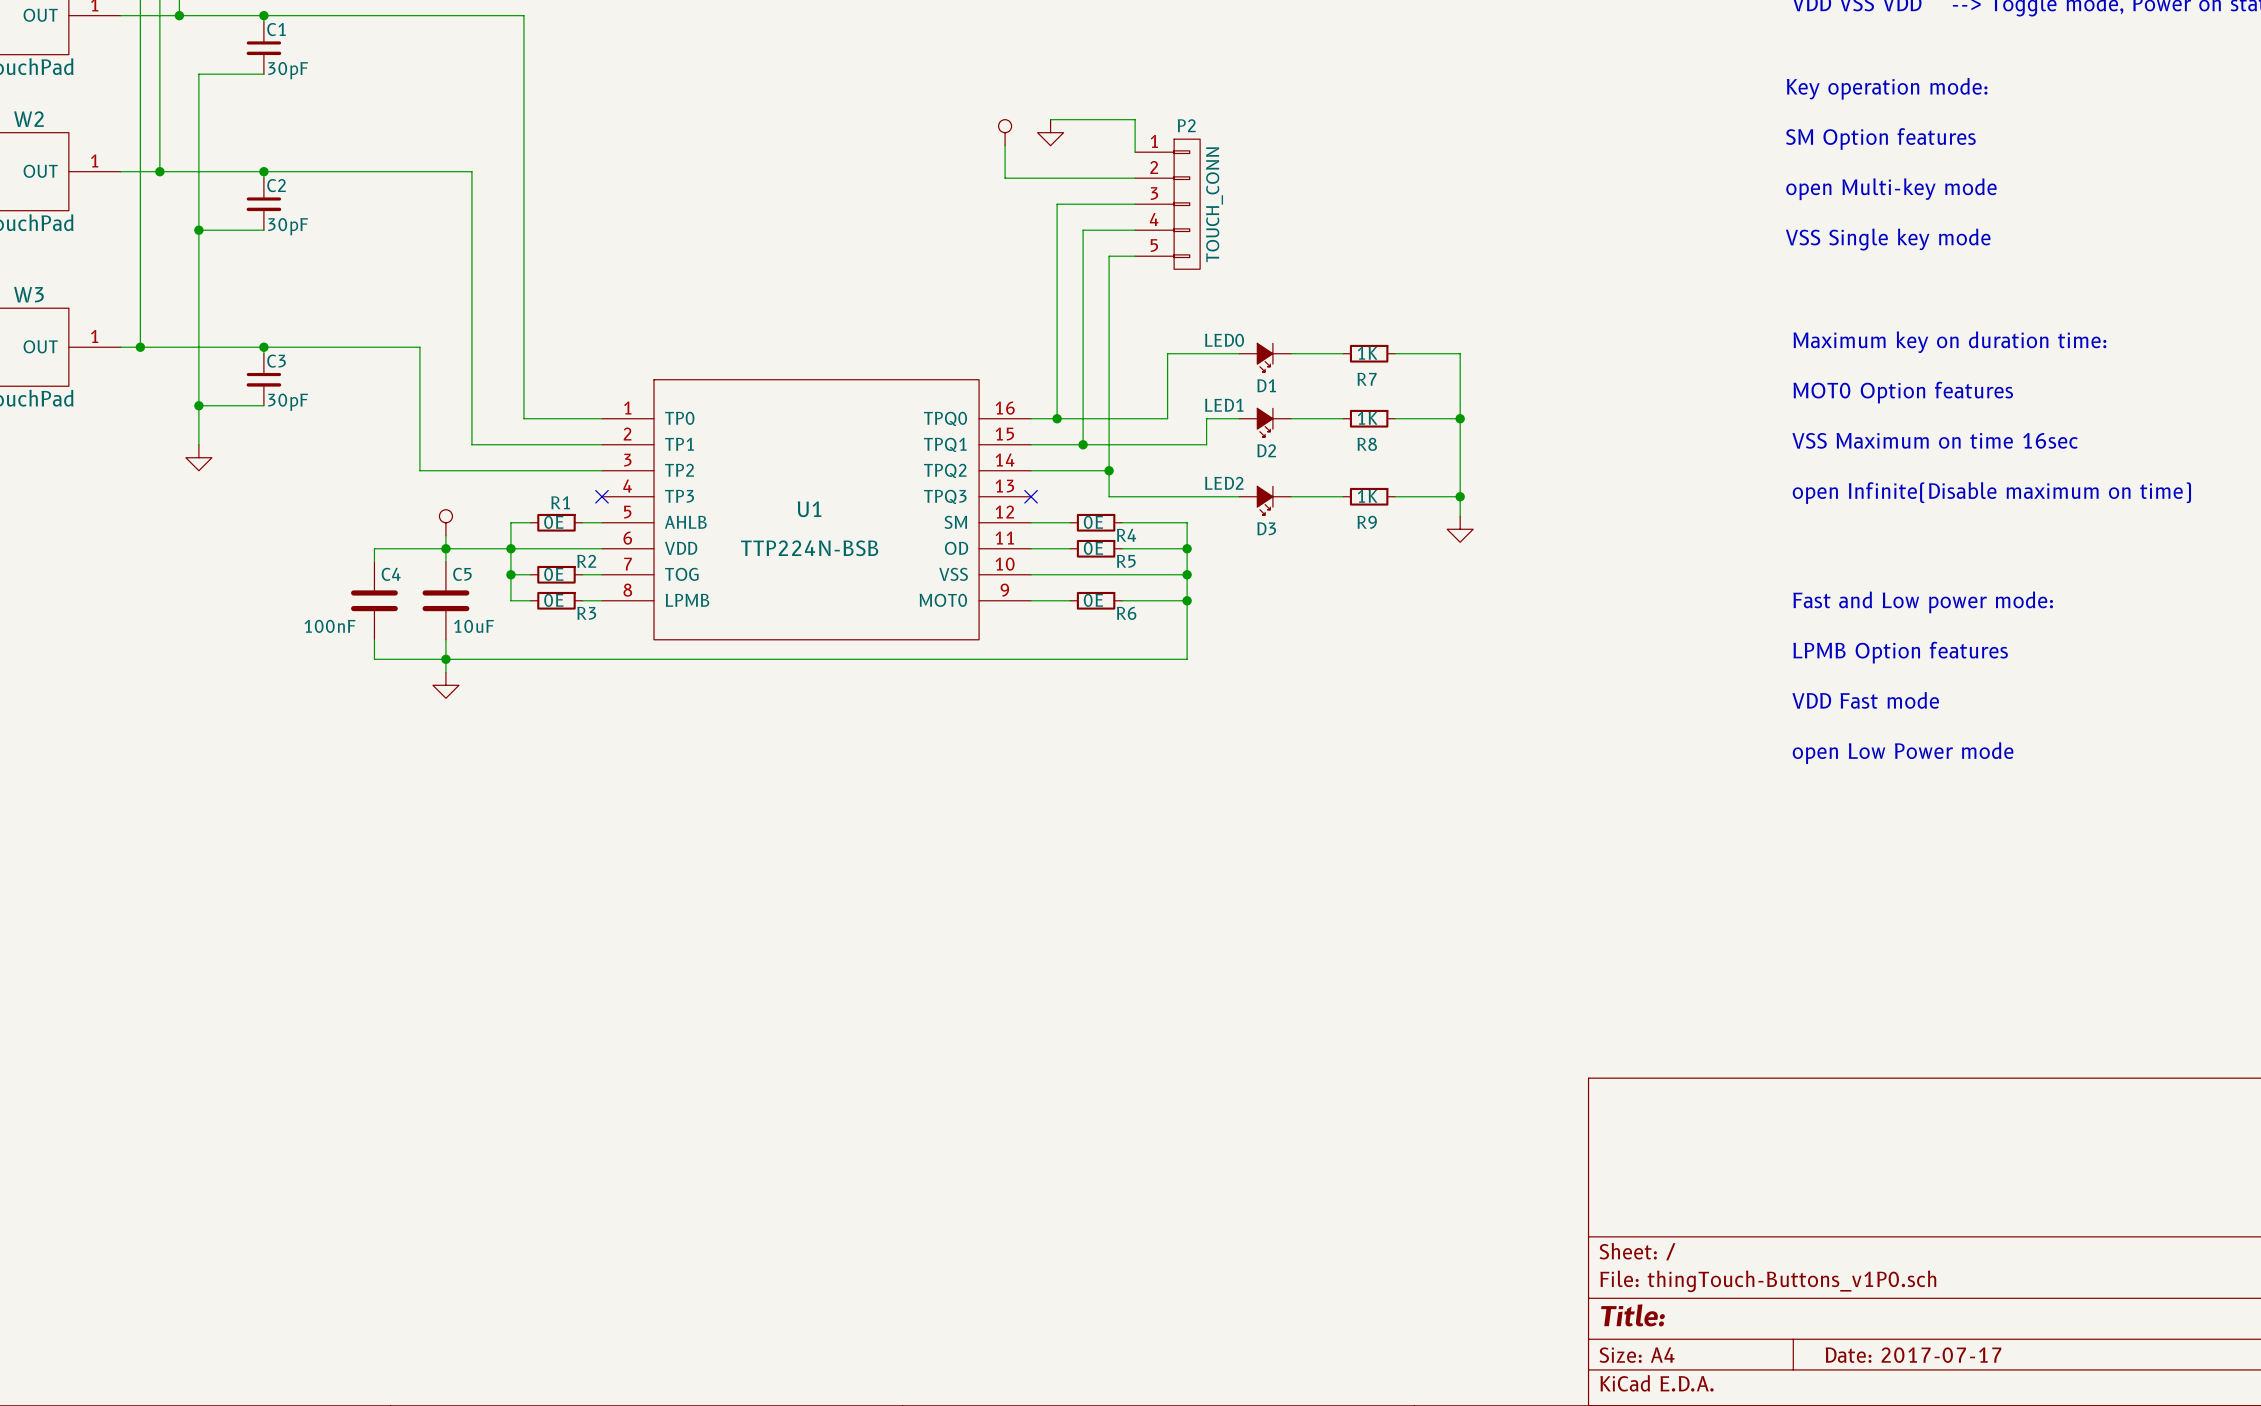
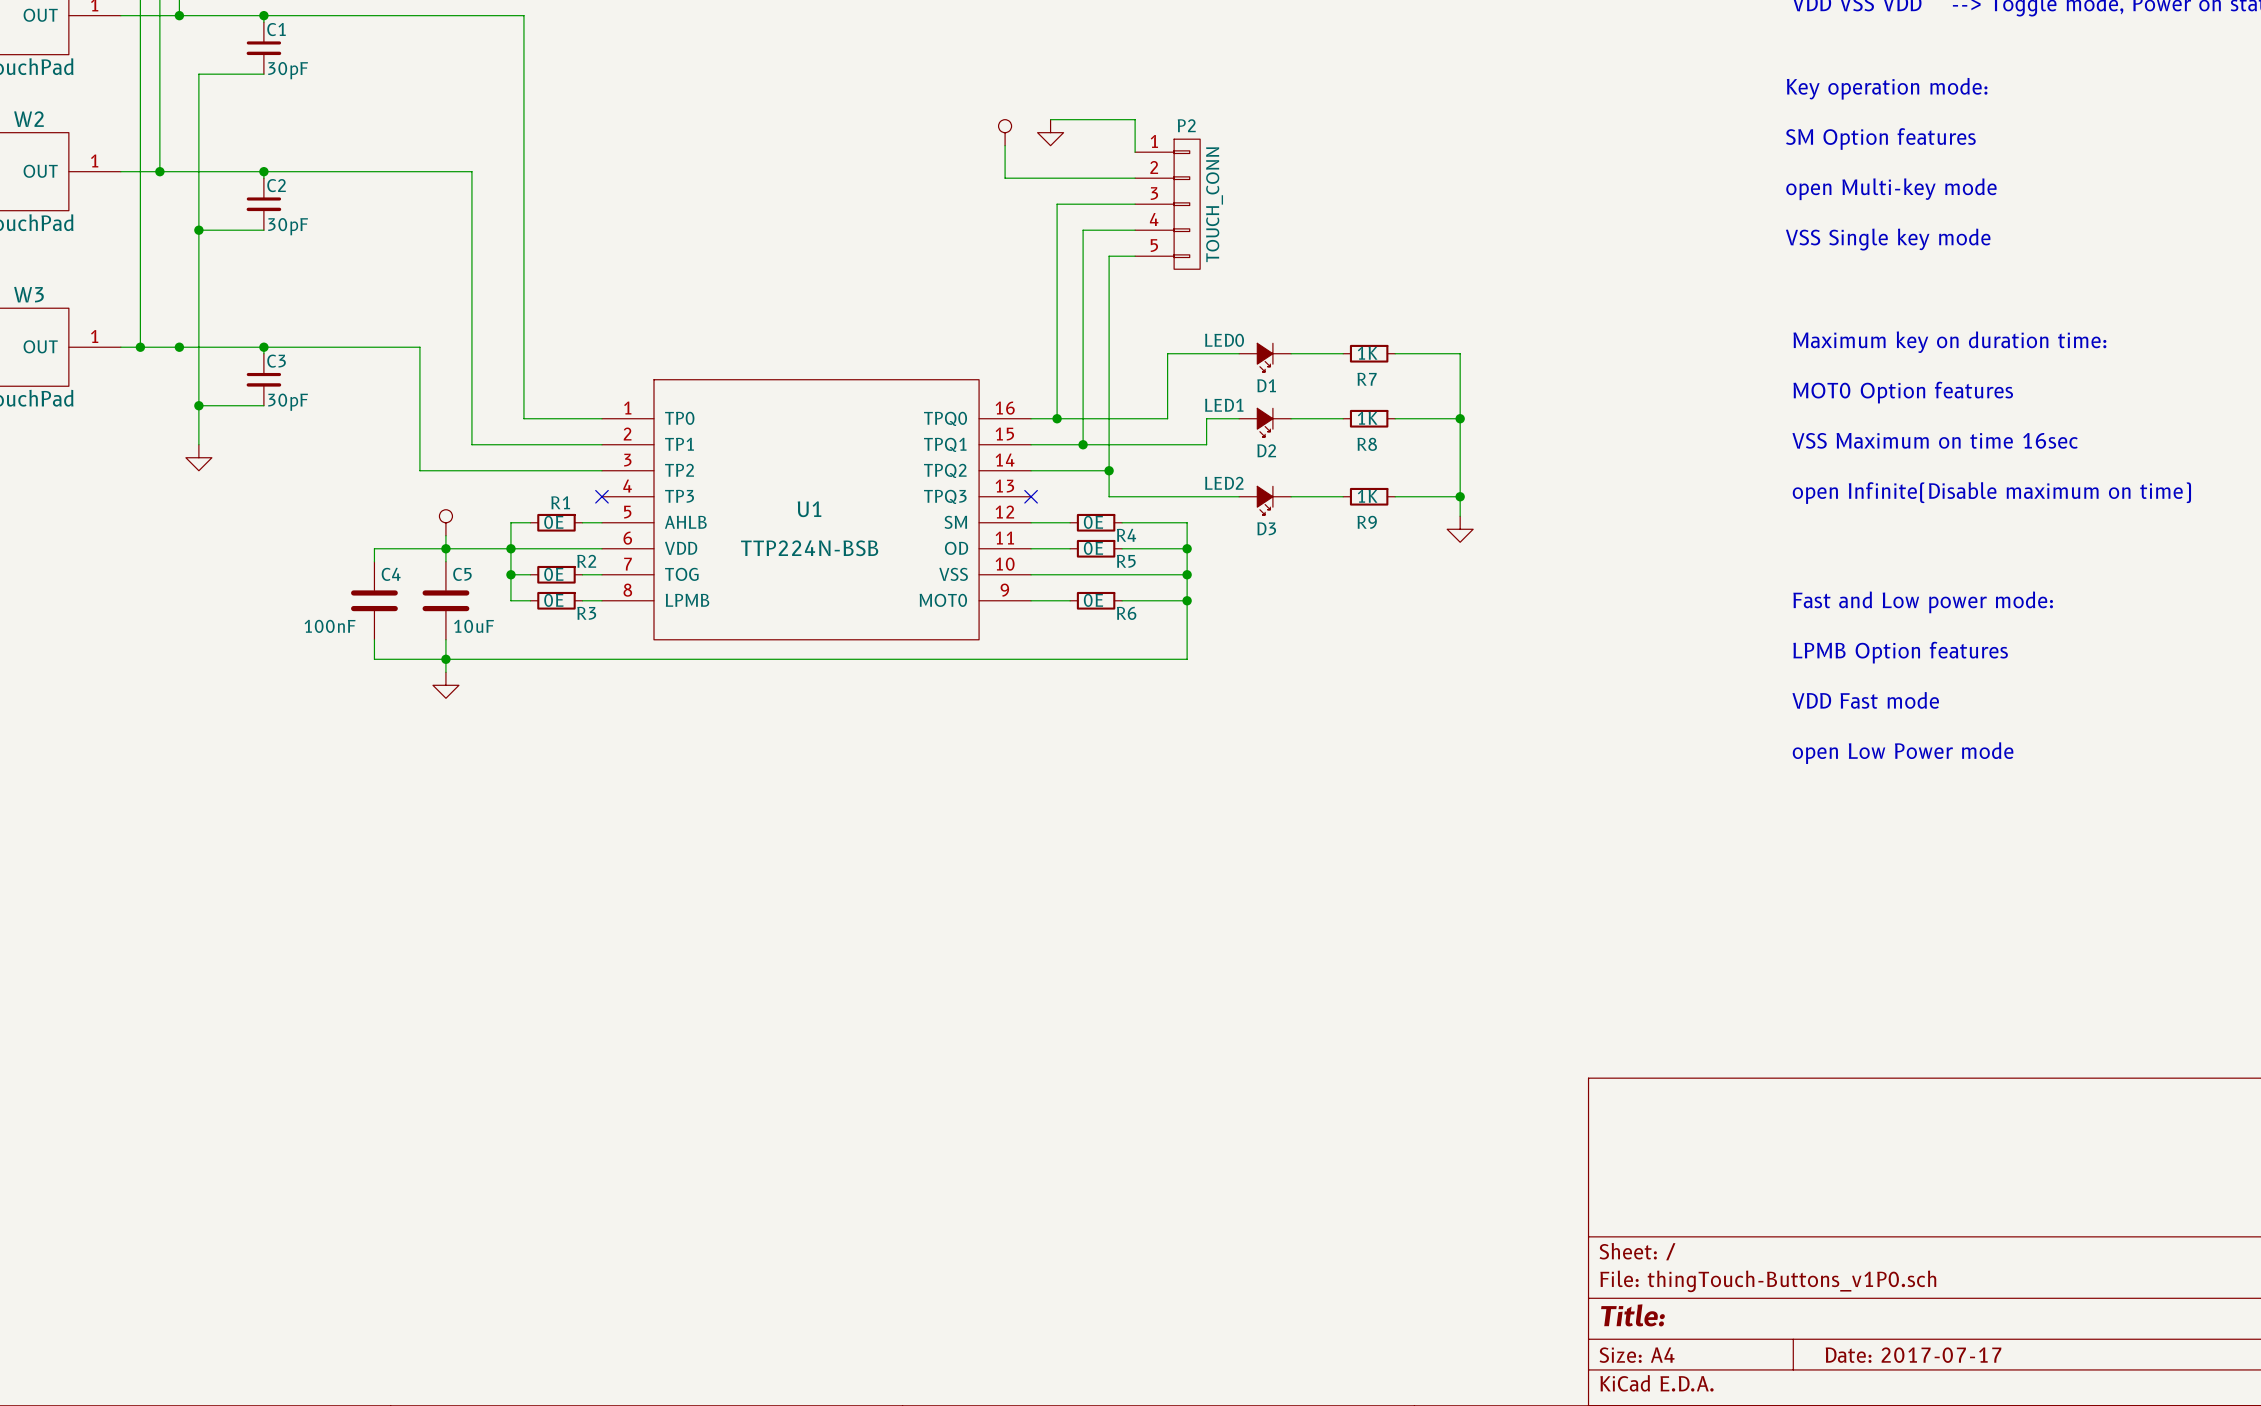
junction: none -> (179, 347)

